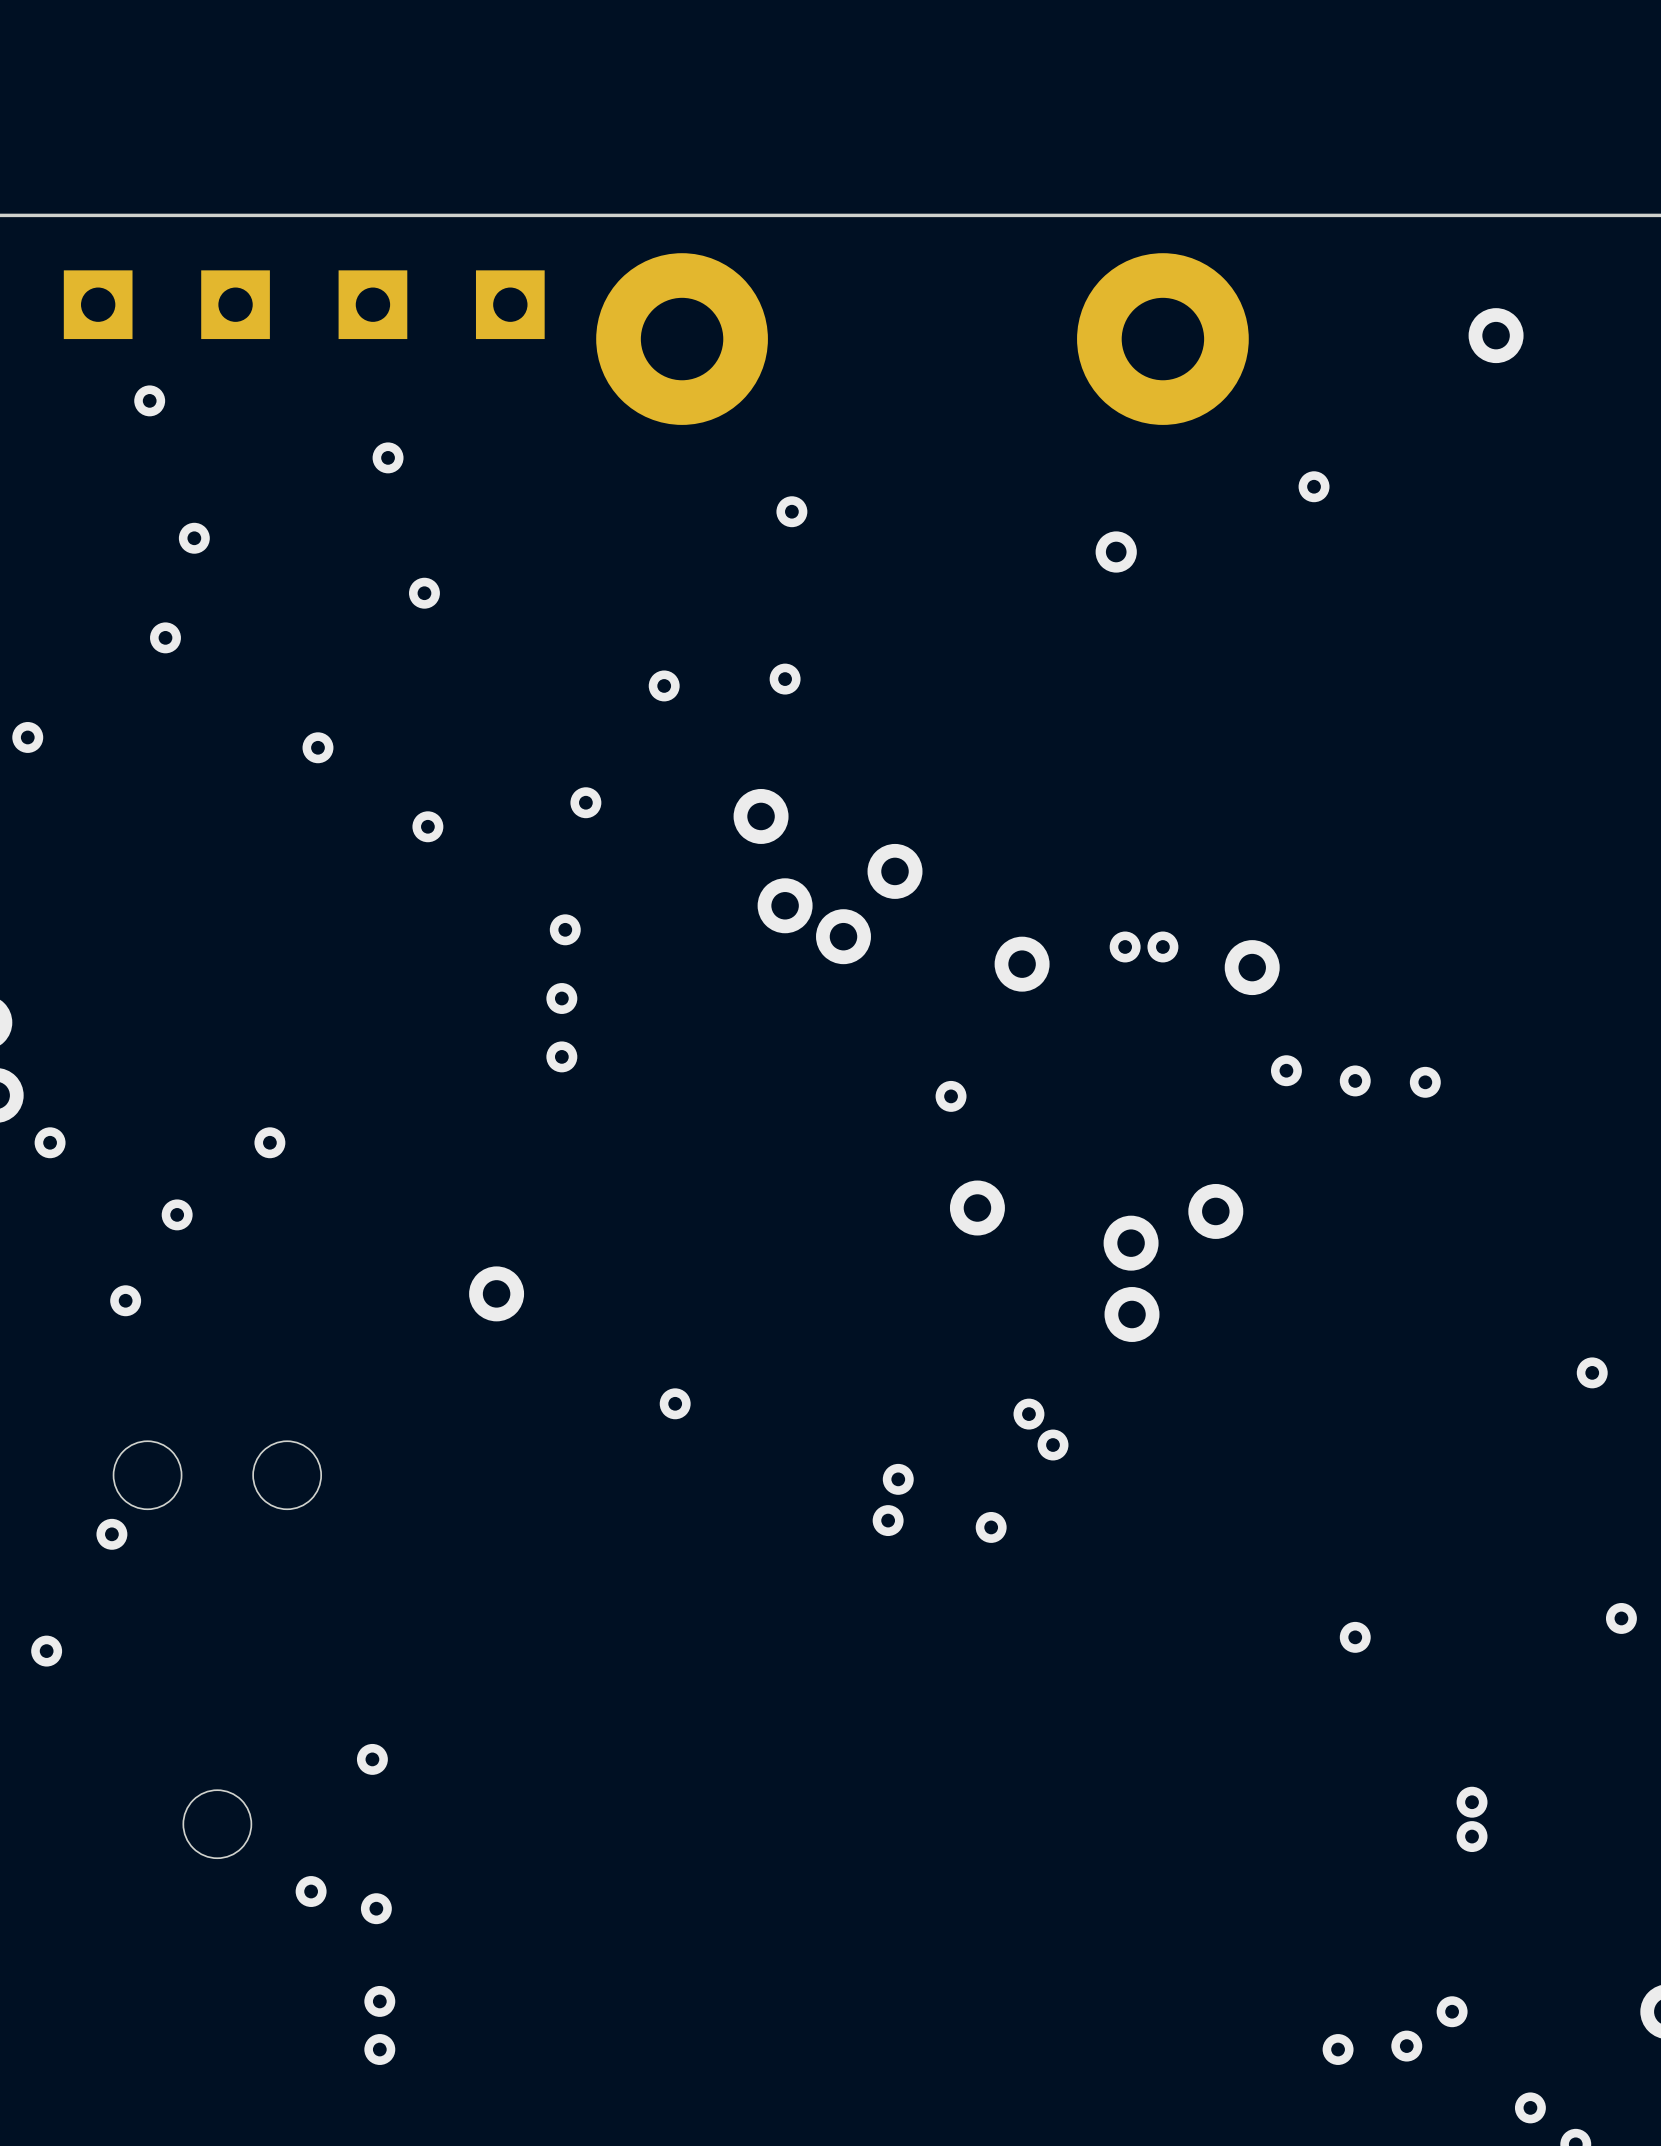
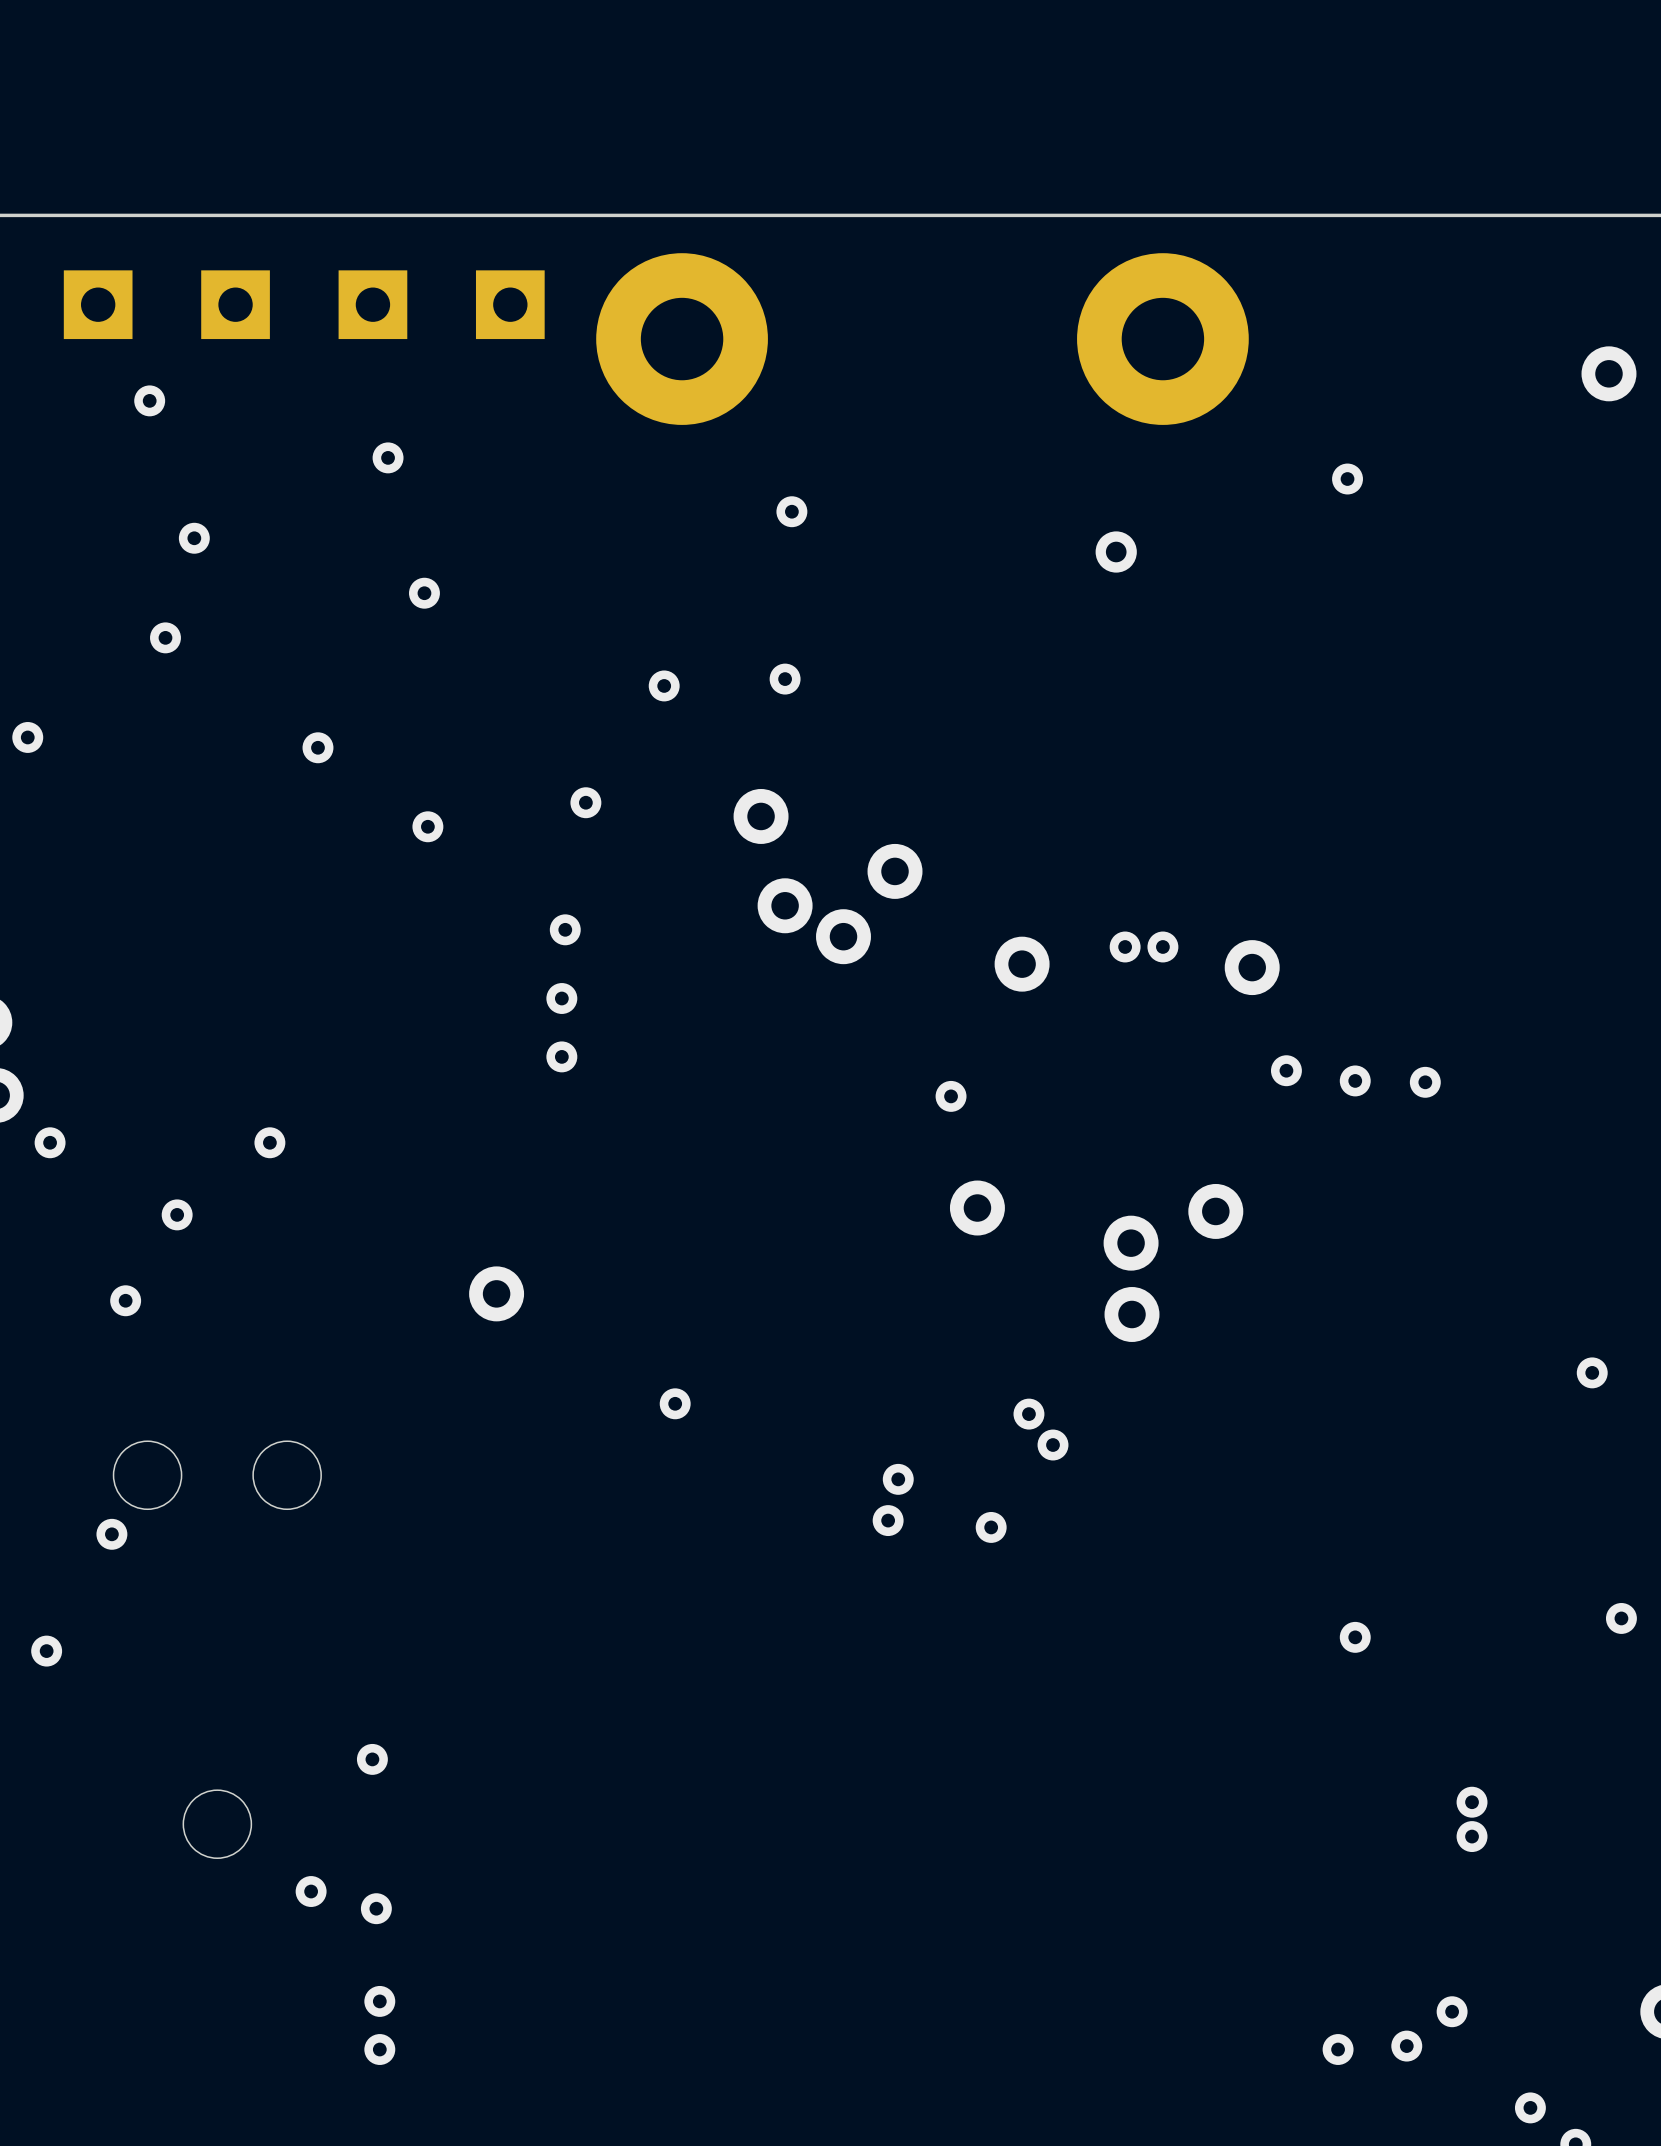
via position: (1496, 335) -> (1608, 373)
via position: (1314, 486) -> (1347, 479)

